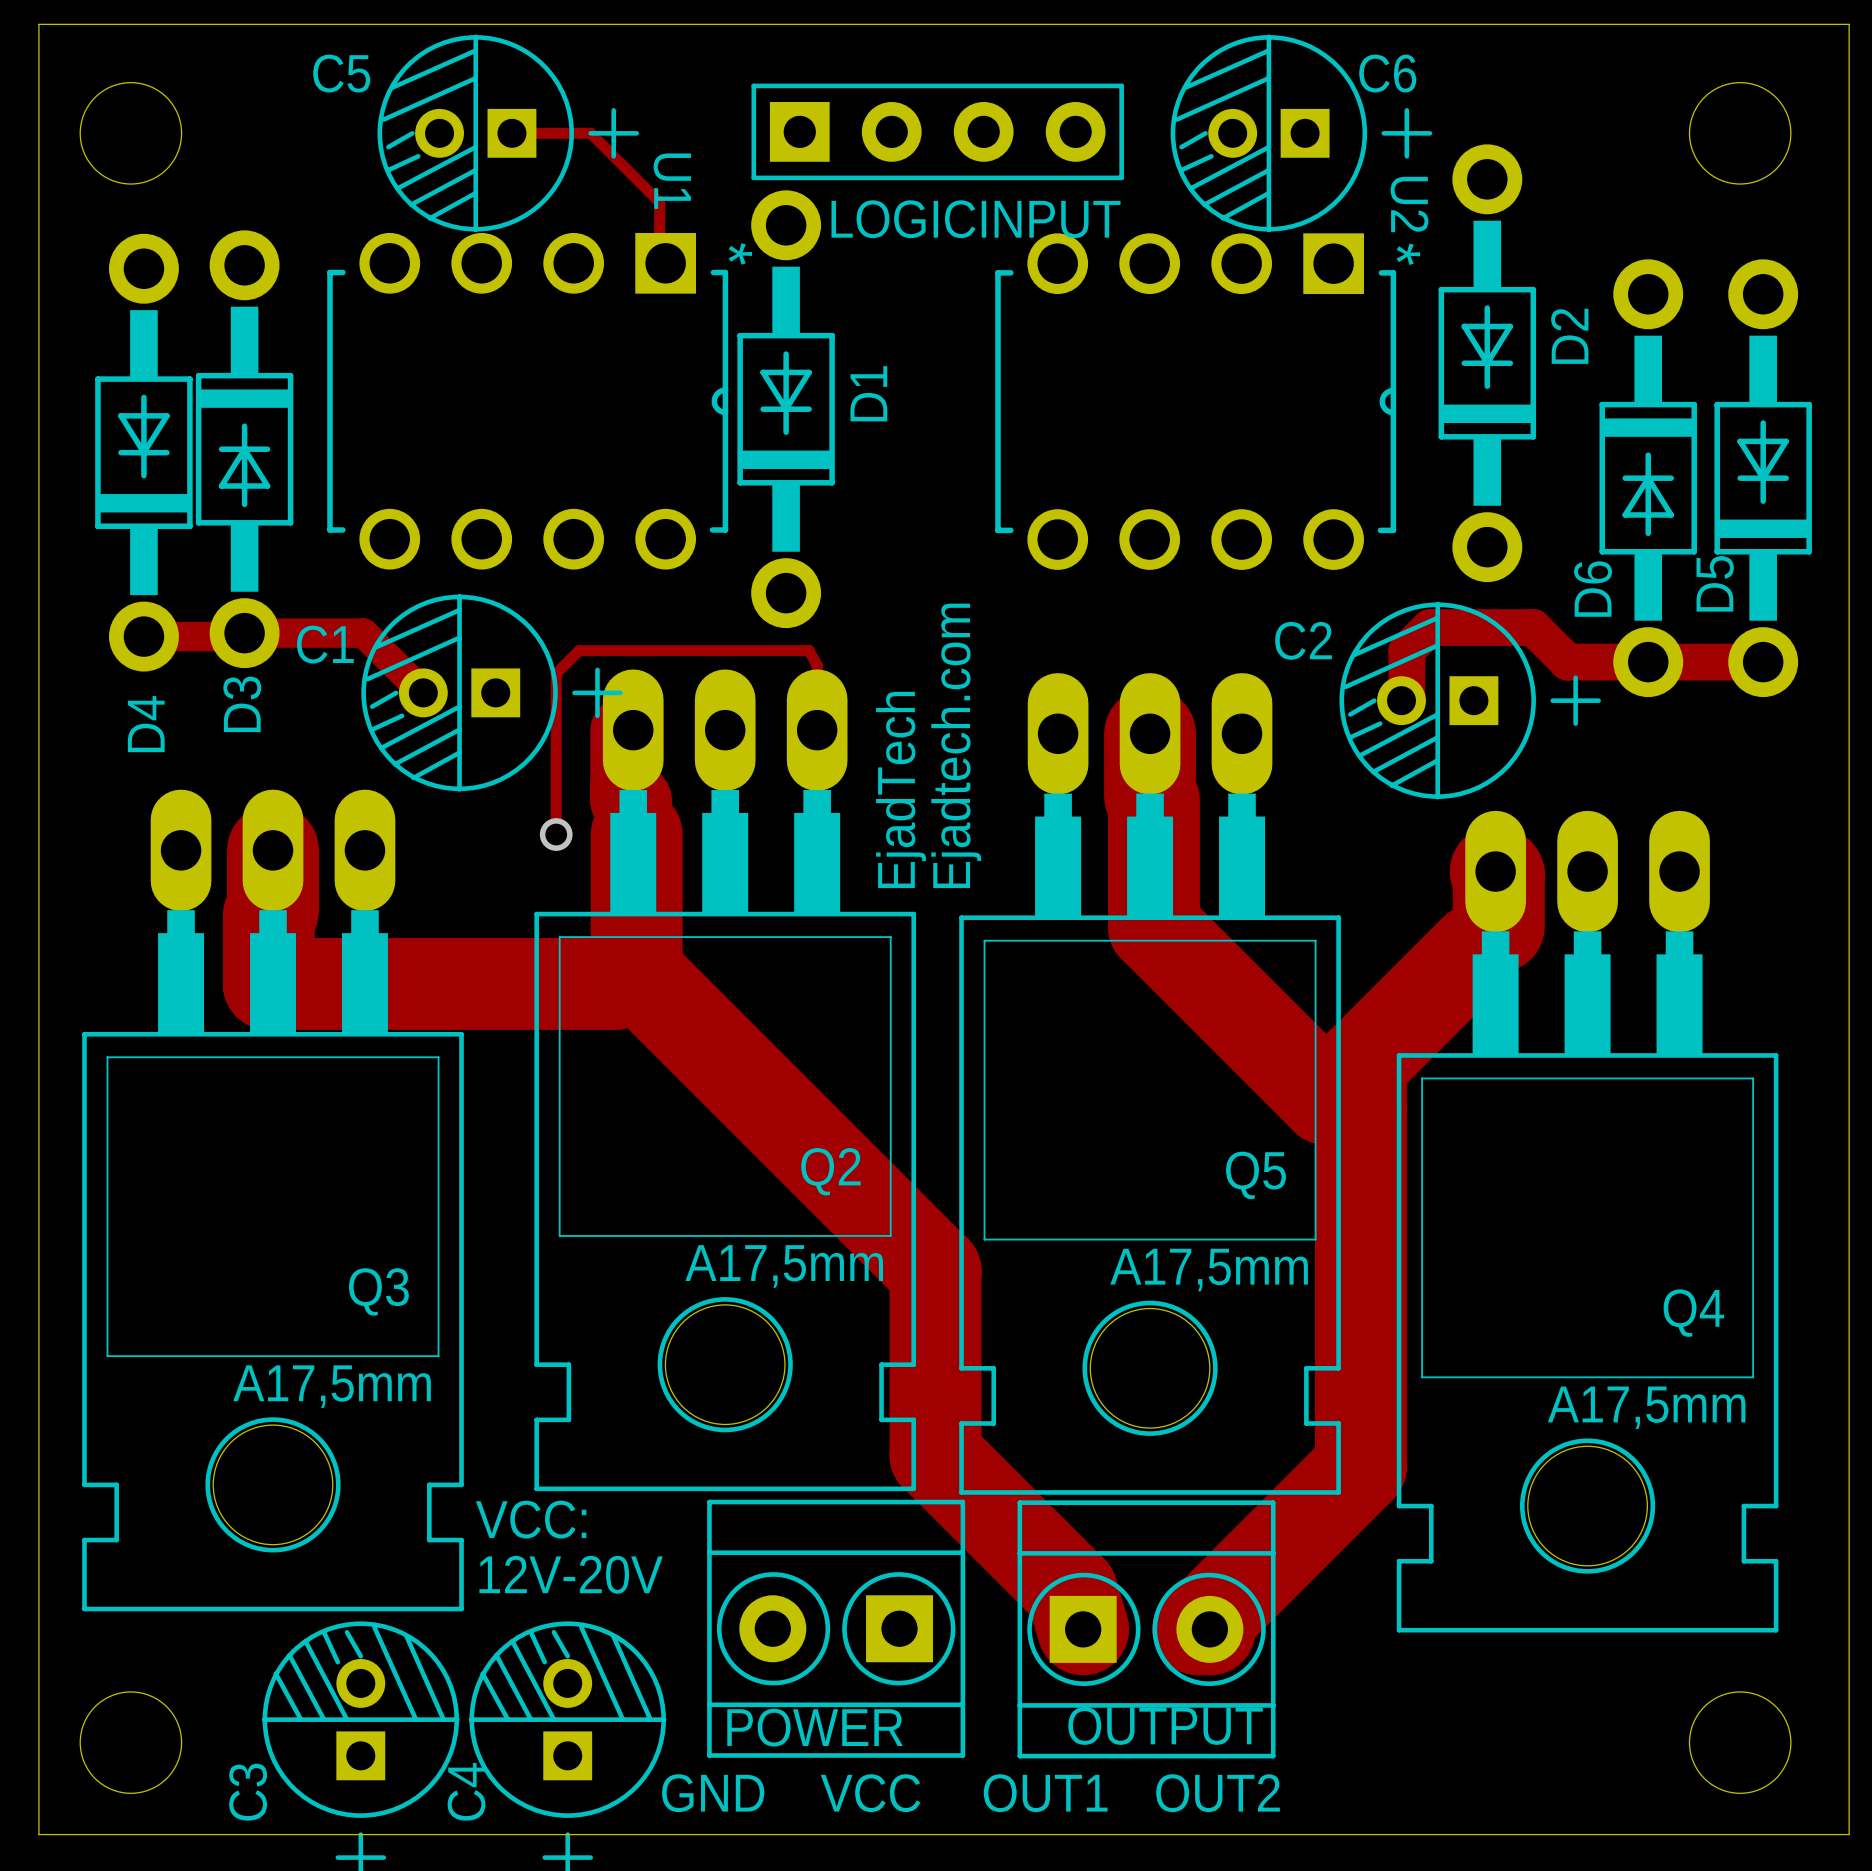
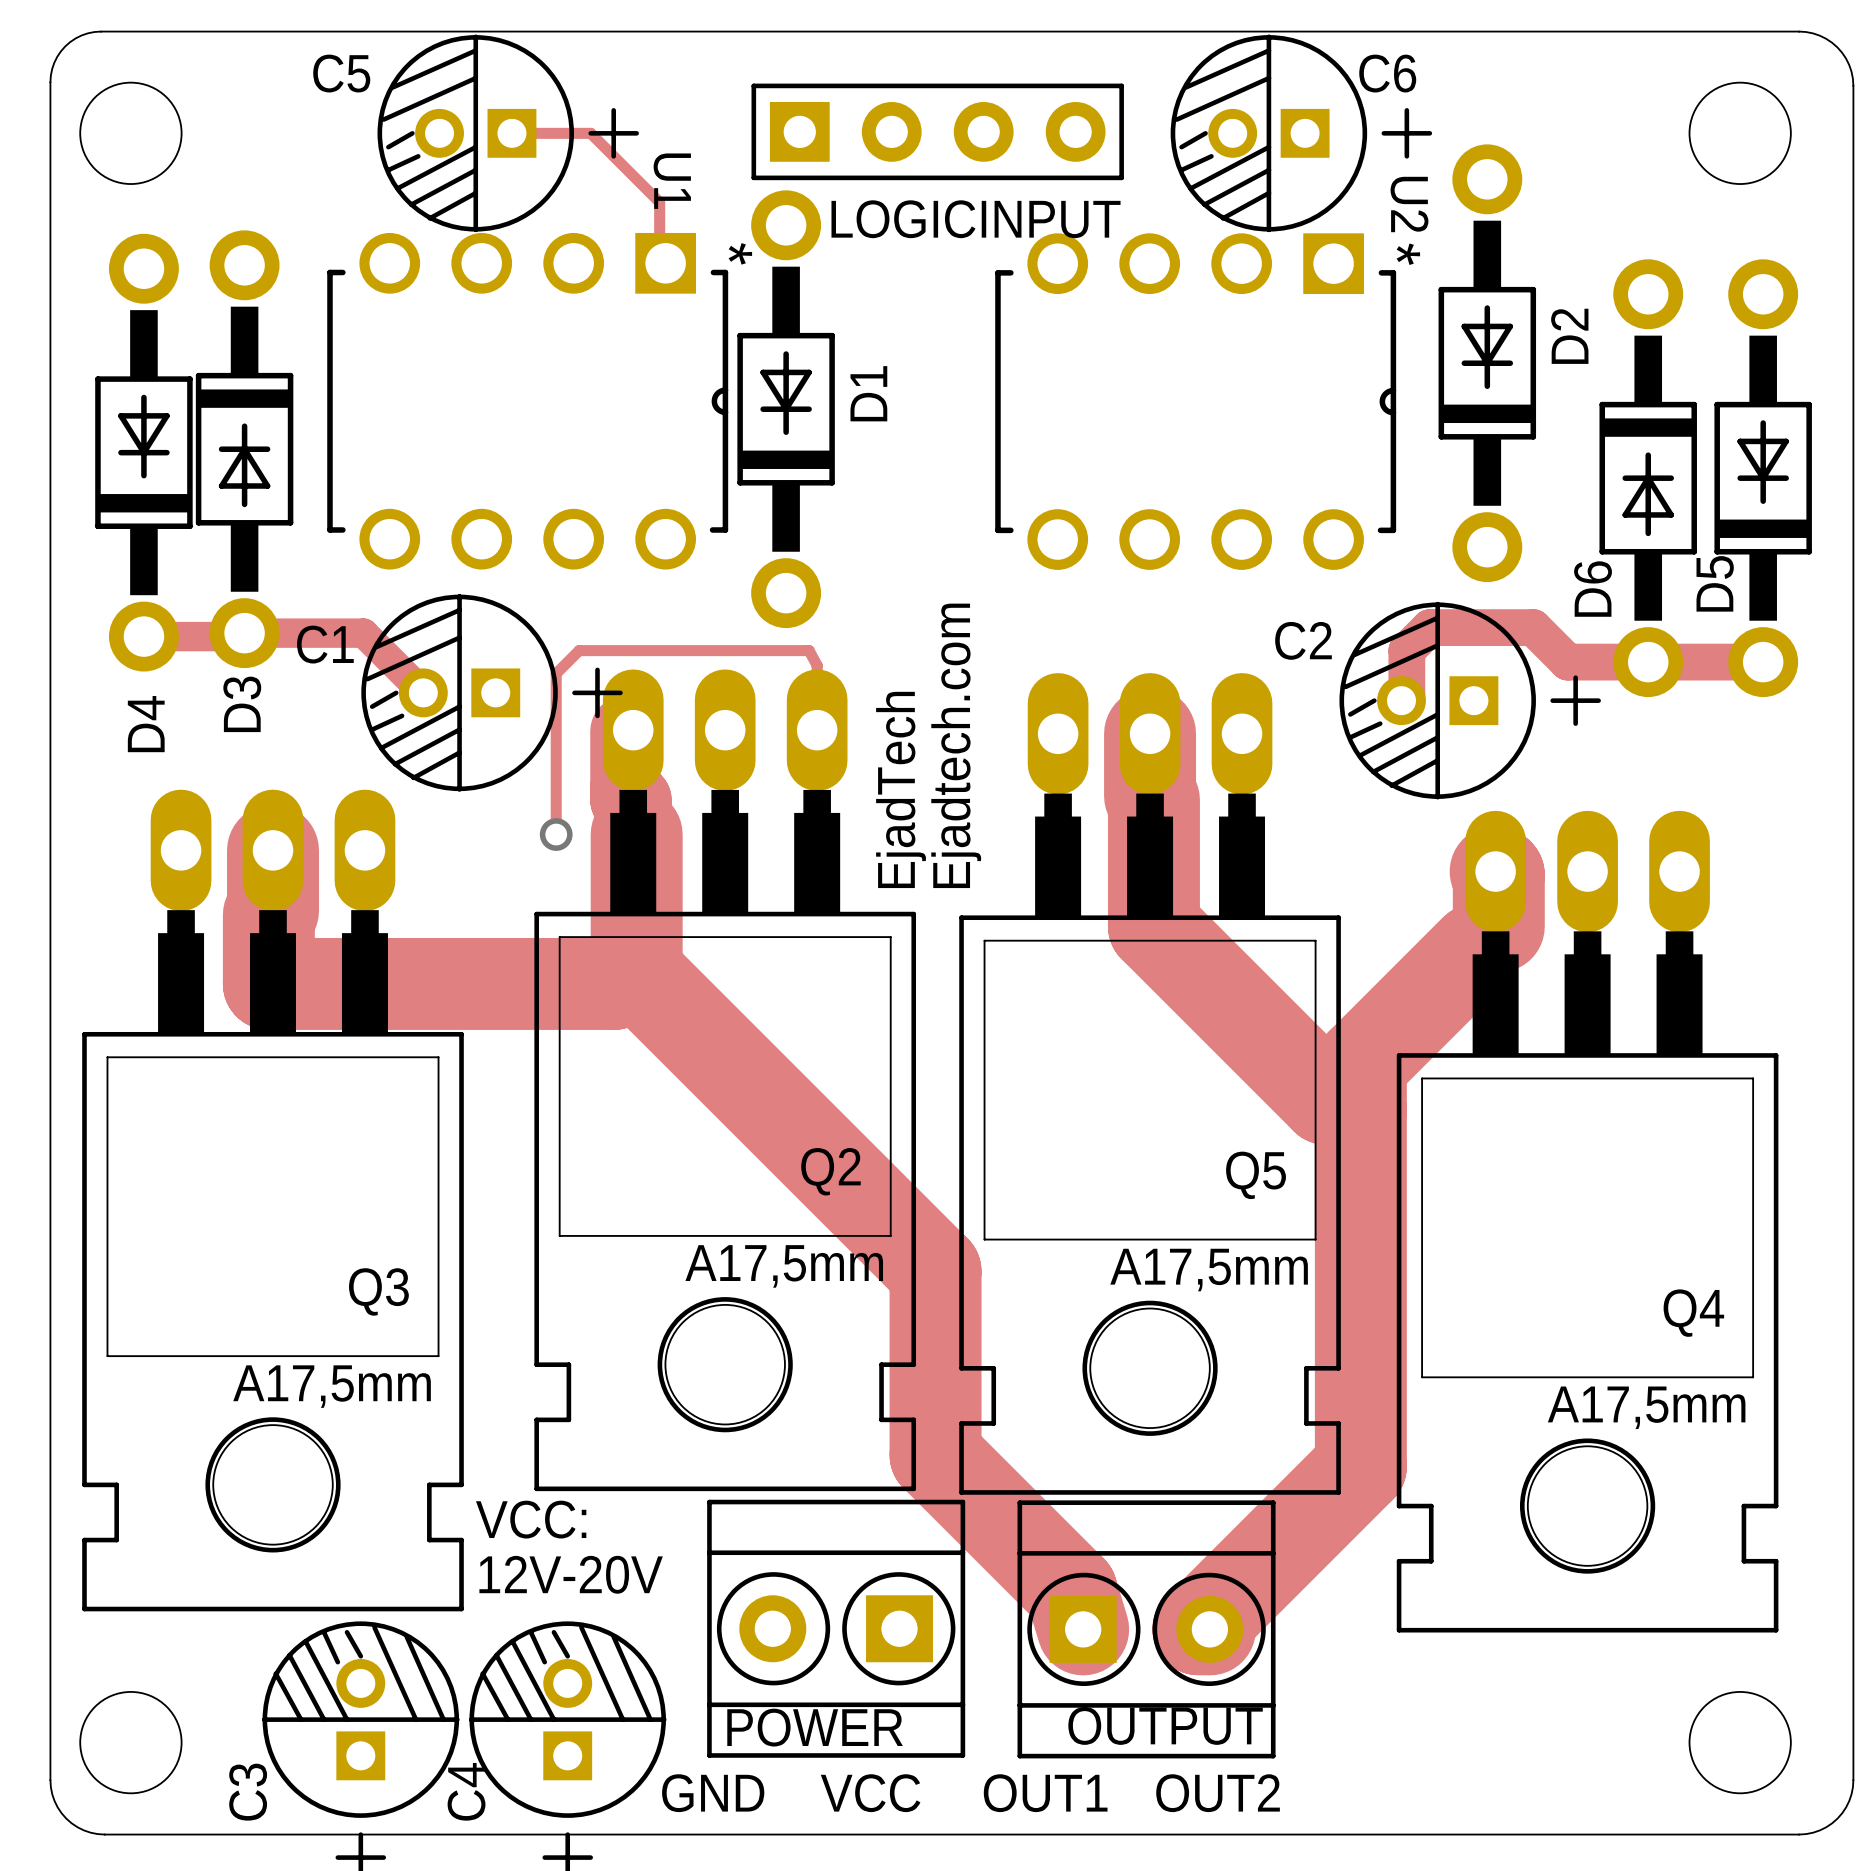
board edge: (104, 1834) (38, 1834) (38, 24) (1849, 24) (1849, 1834) (1799, 1834) -> (104, 1834) (83, 1830) (66, 1818) (54, 1801) (50, 1780) (50, 82) (54, 62) (65, 46) (81, 35) (101, 31) (1799, 31) (1819, 35) (1837, 47) (1849, 65) (1853, 85) (1853, 1780) (1849, 1801) (1837, 1818) (1819, 1830) (1799, 1834)

